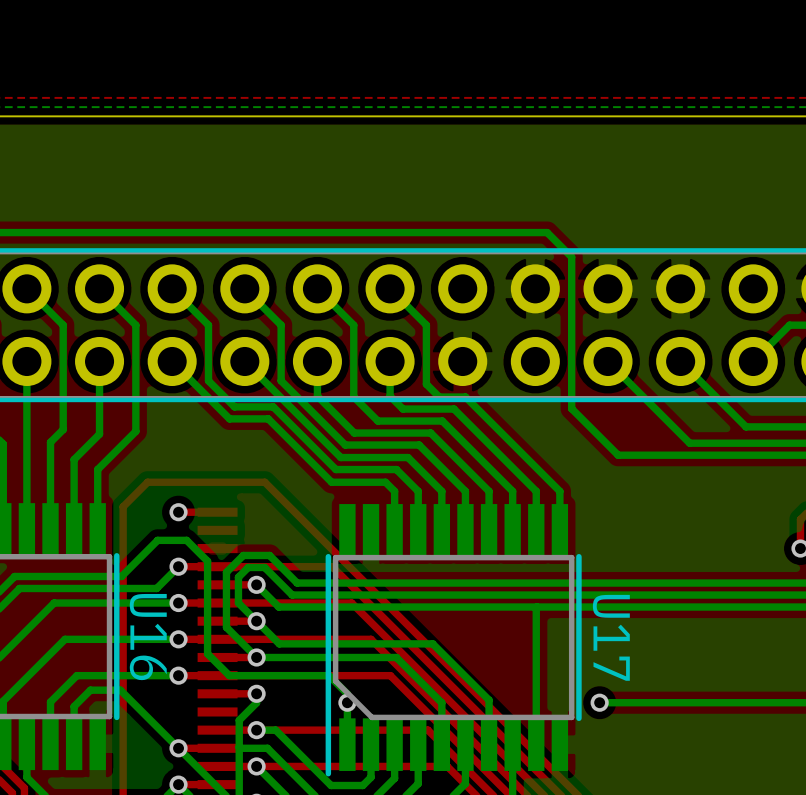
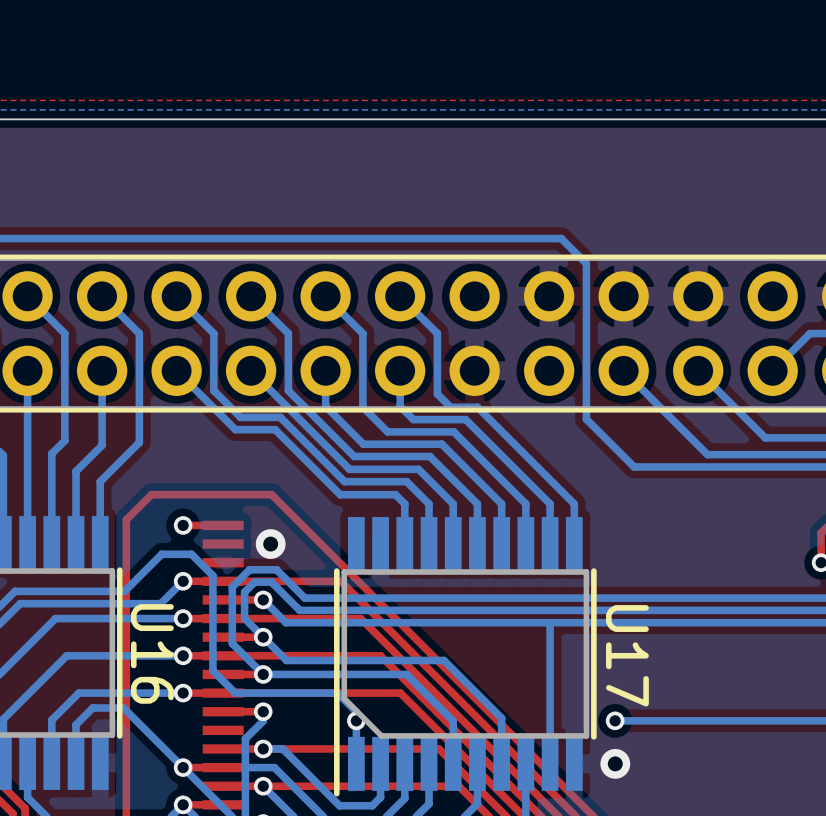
via: none -> (270, 544)
via: none -> (615, 763)

